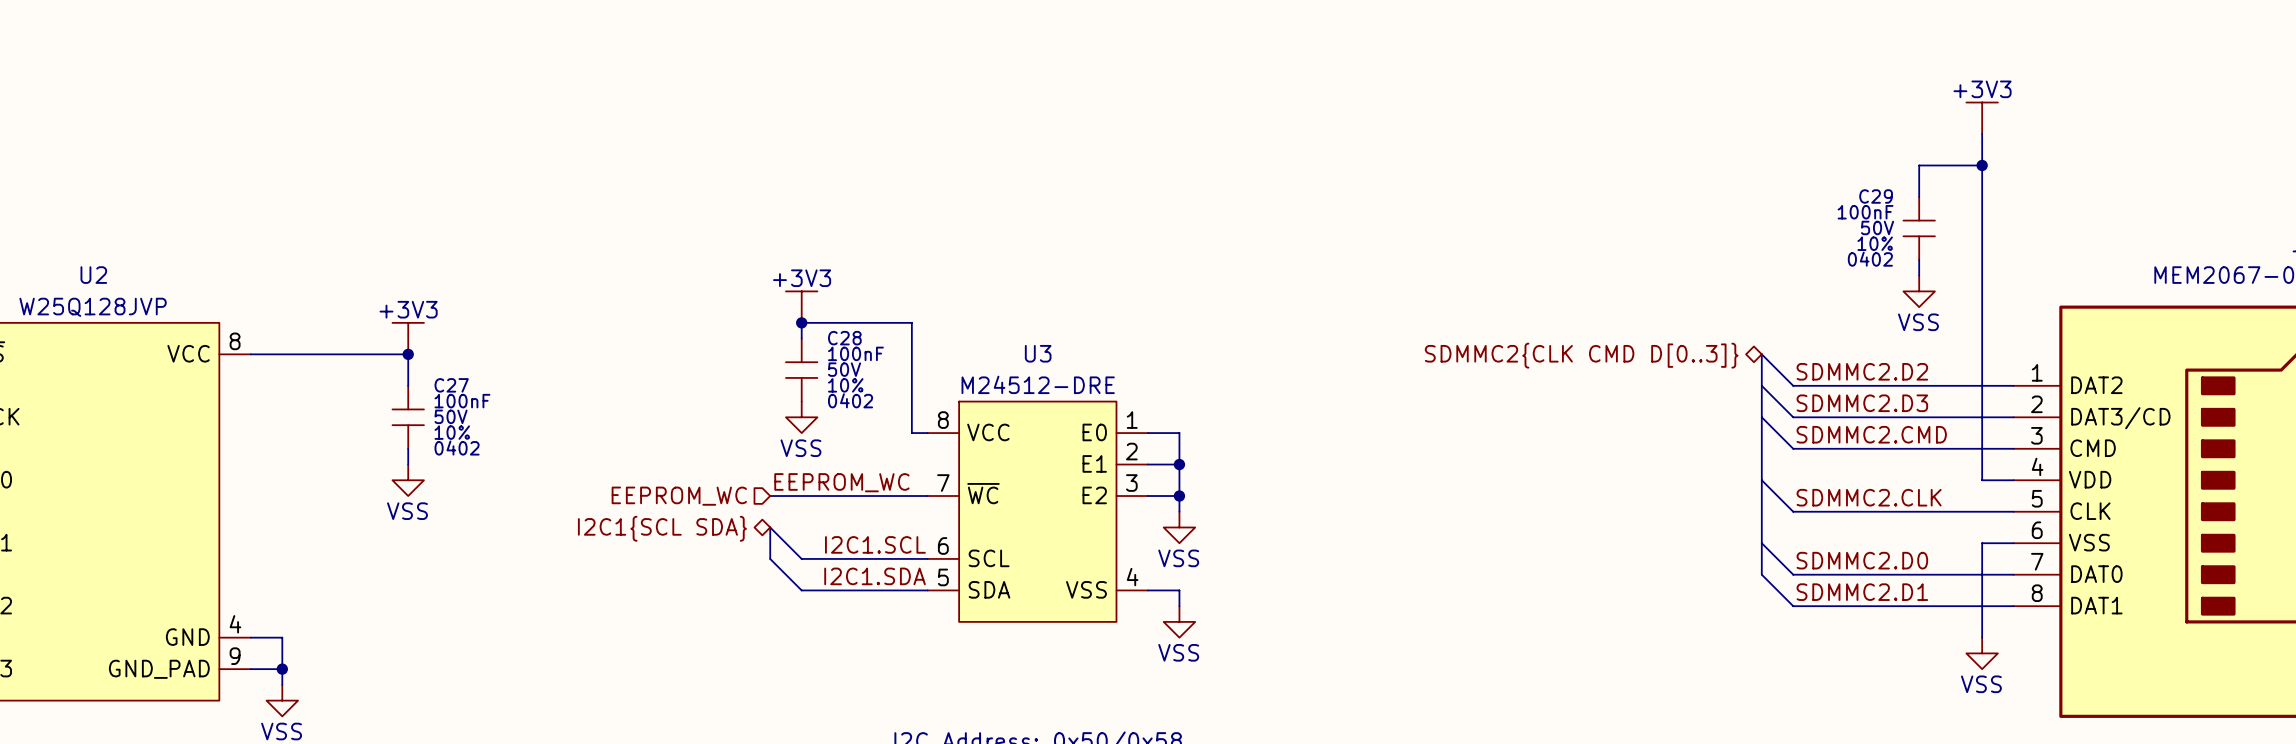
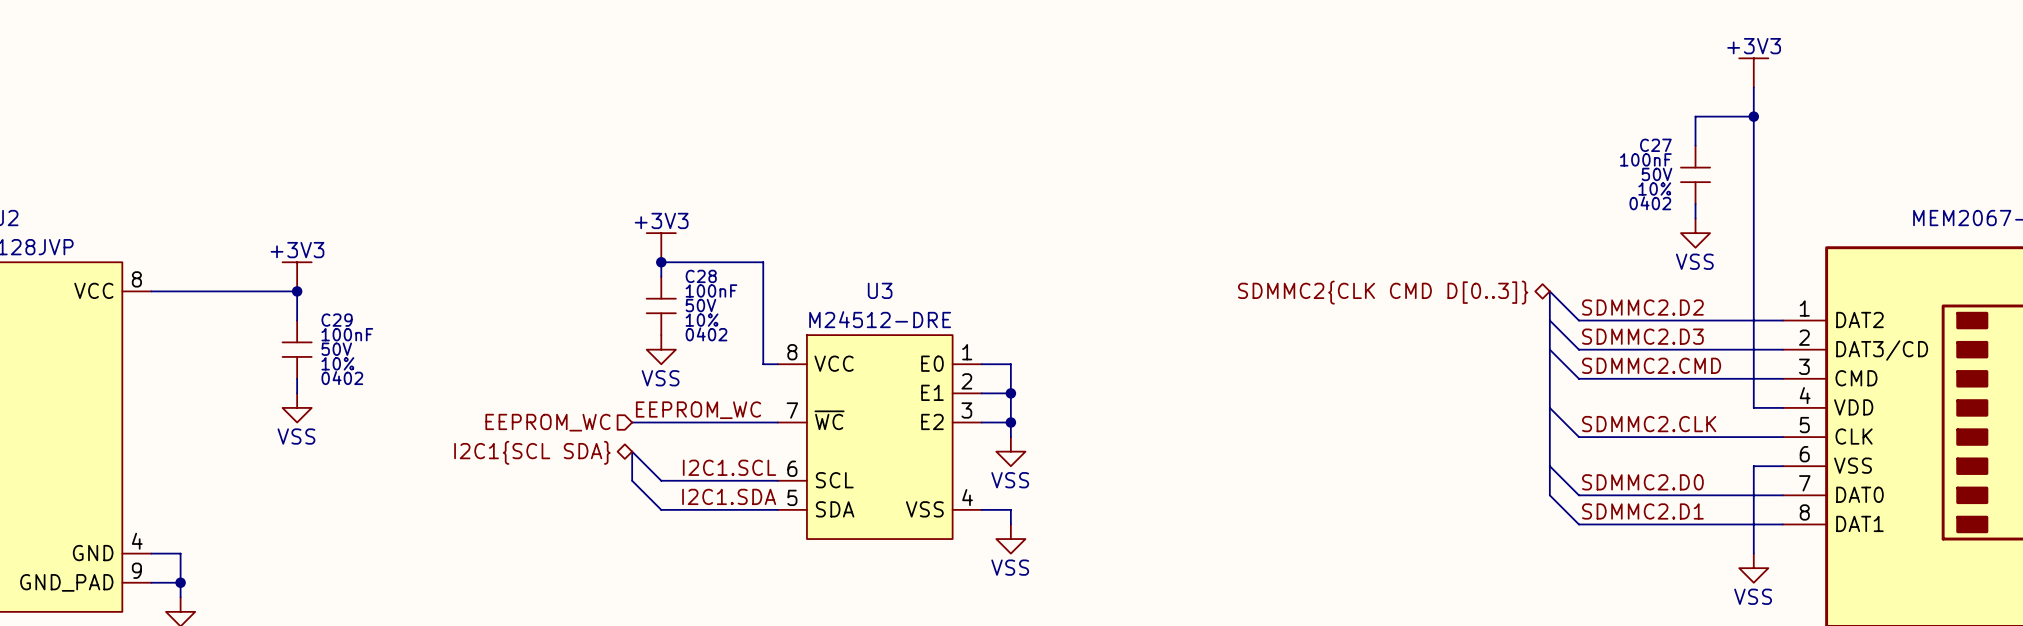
C29 name: C29 (1876, 196) -> C27 (1655, 145)
C27 name: C27 (451, 385) -> C29 (337, 320)

